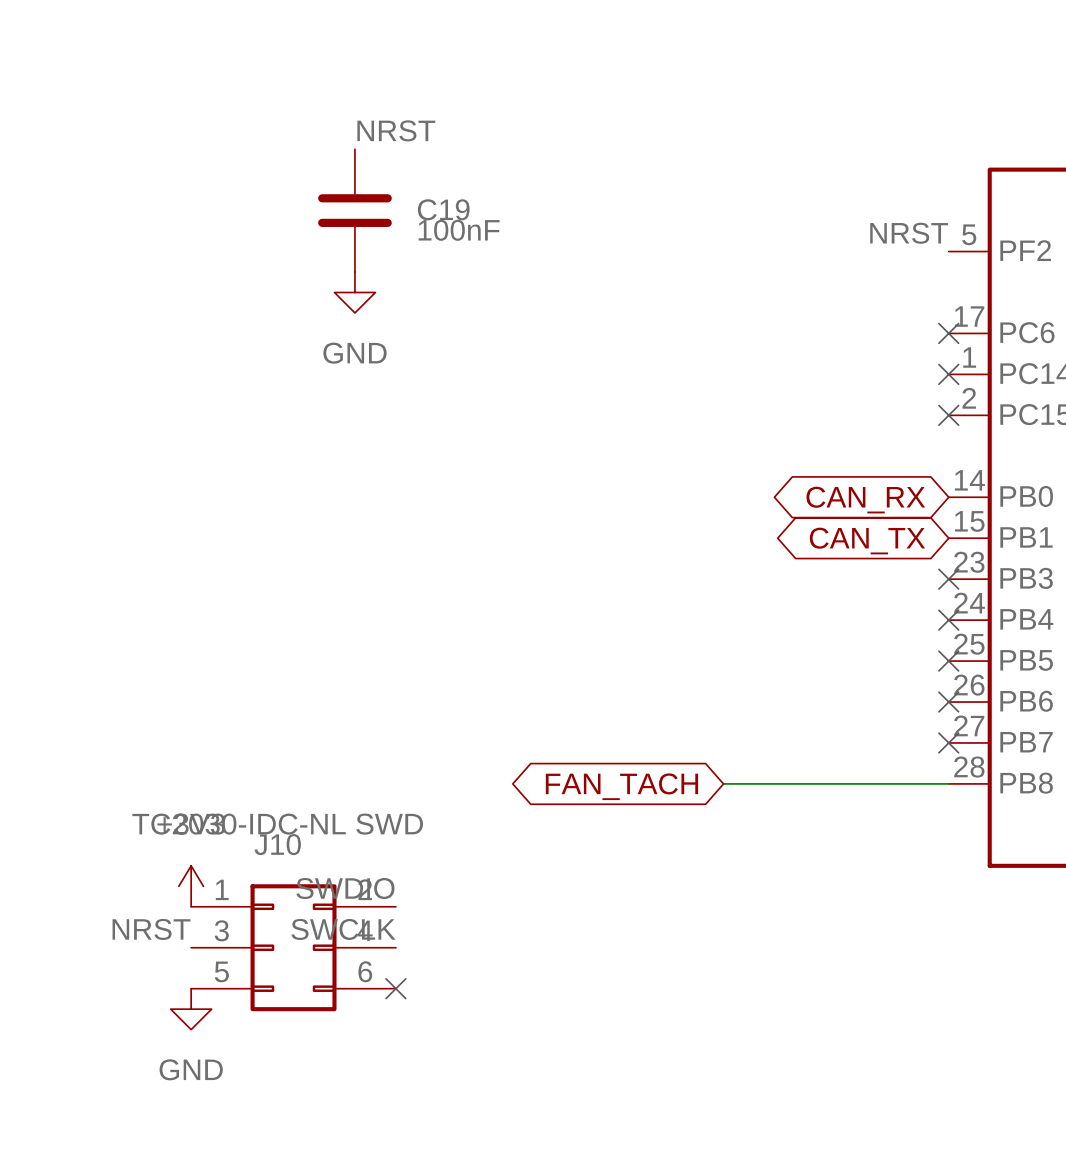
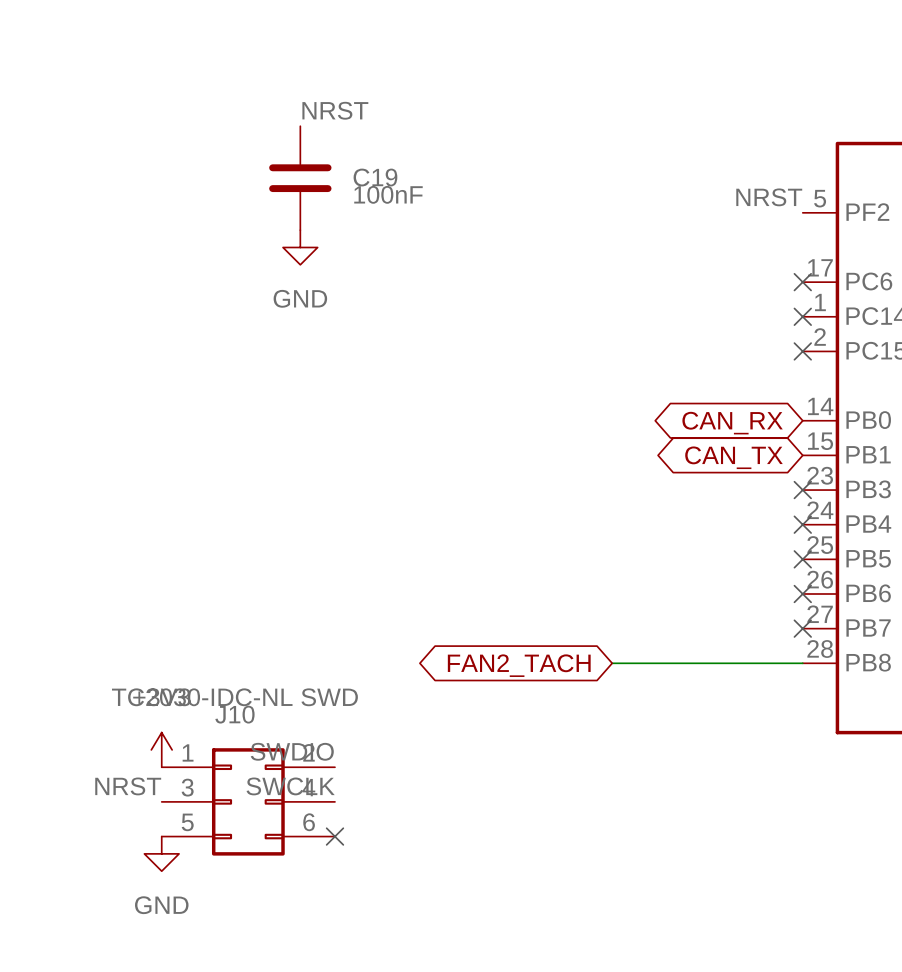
global label: FAN_TACH (621, 786) -> FAN2_TACH (519, 665)

